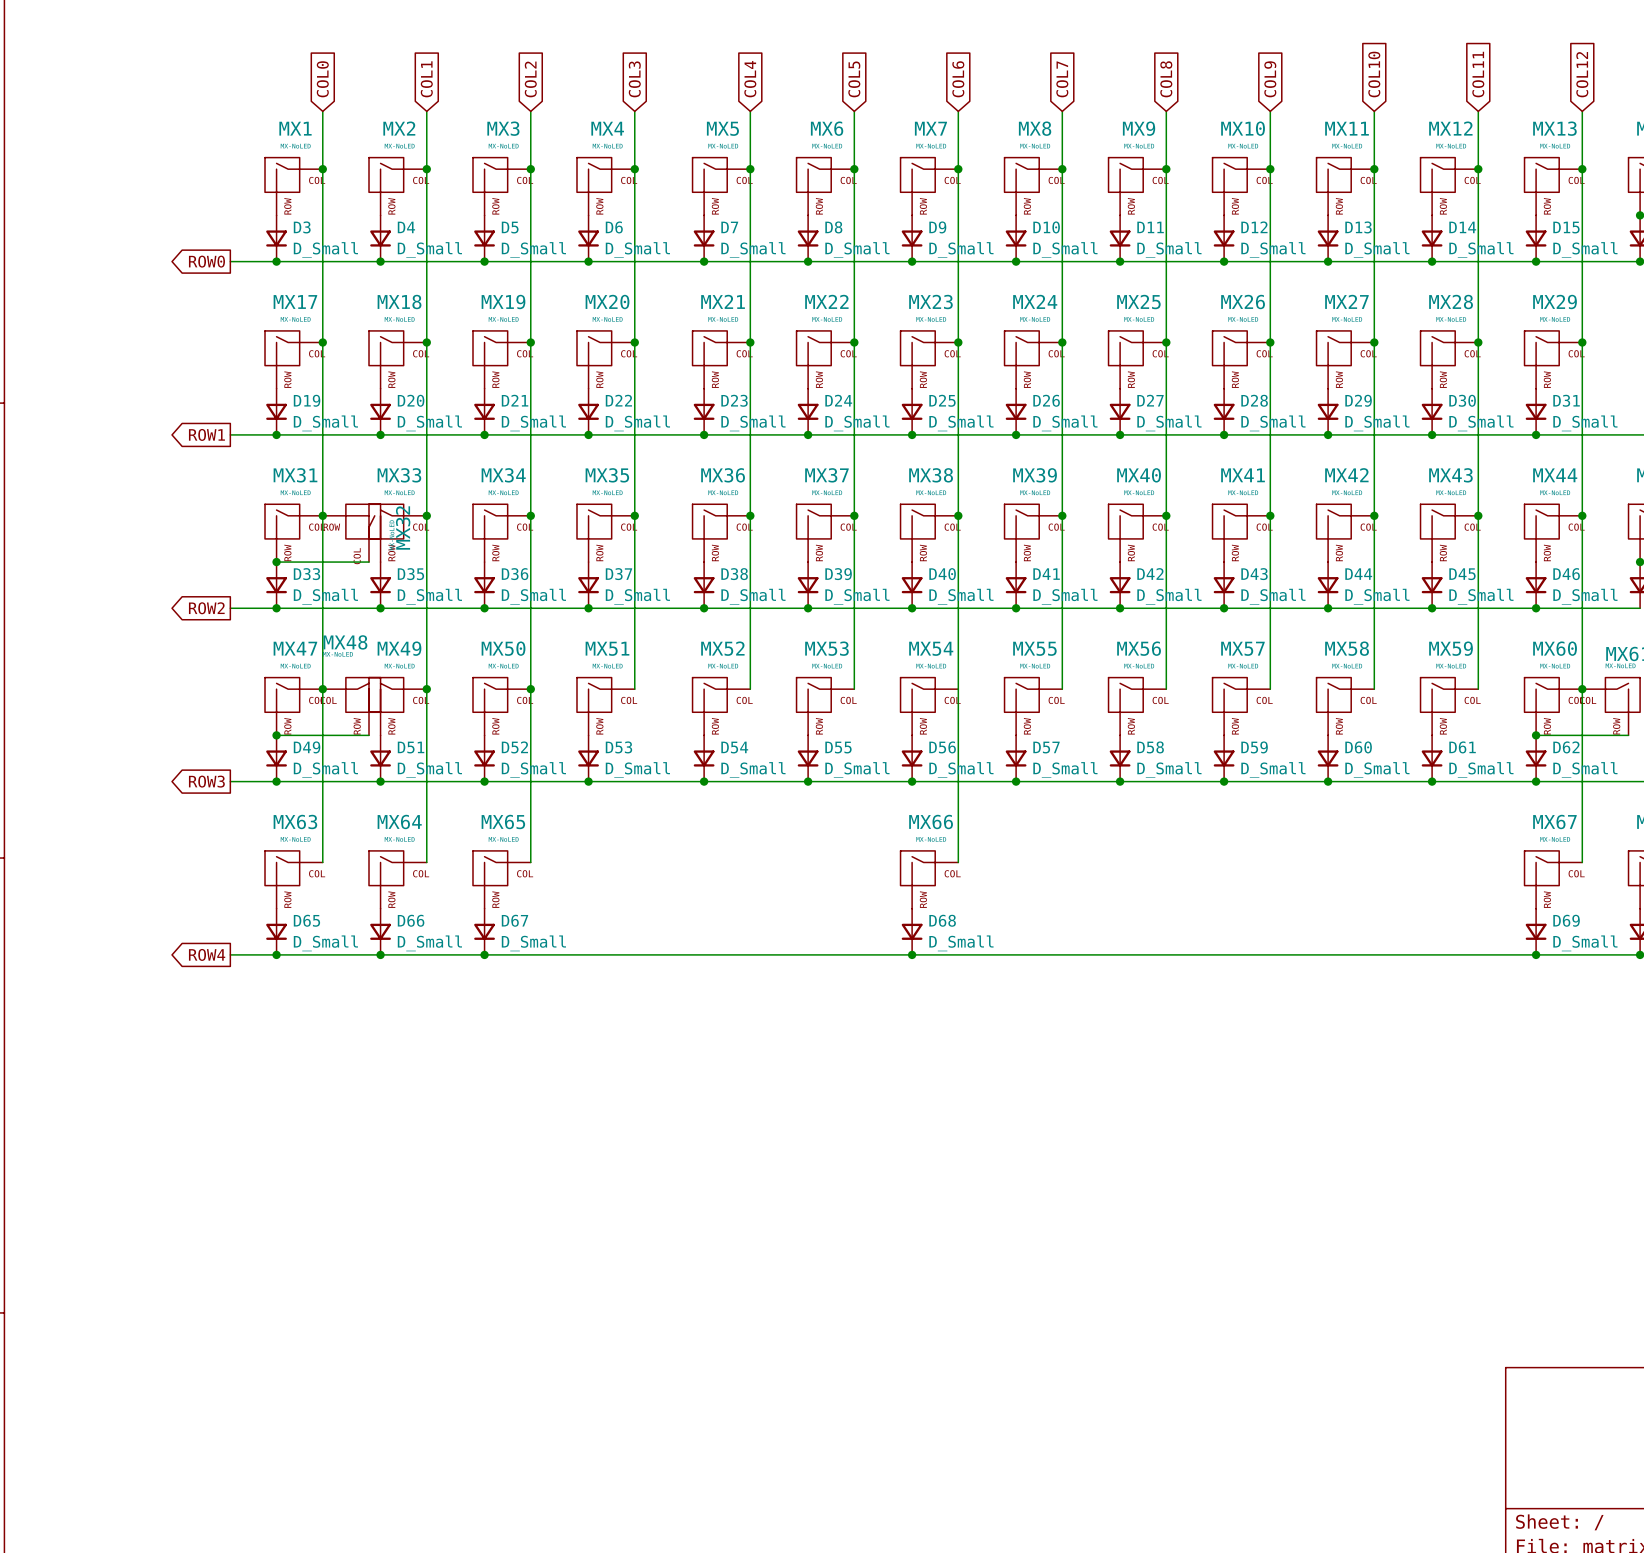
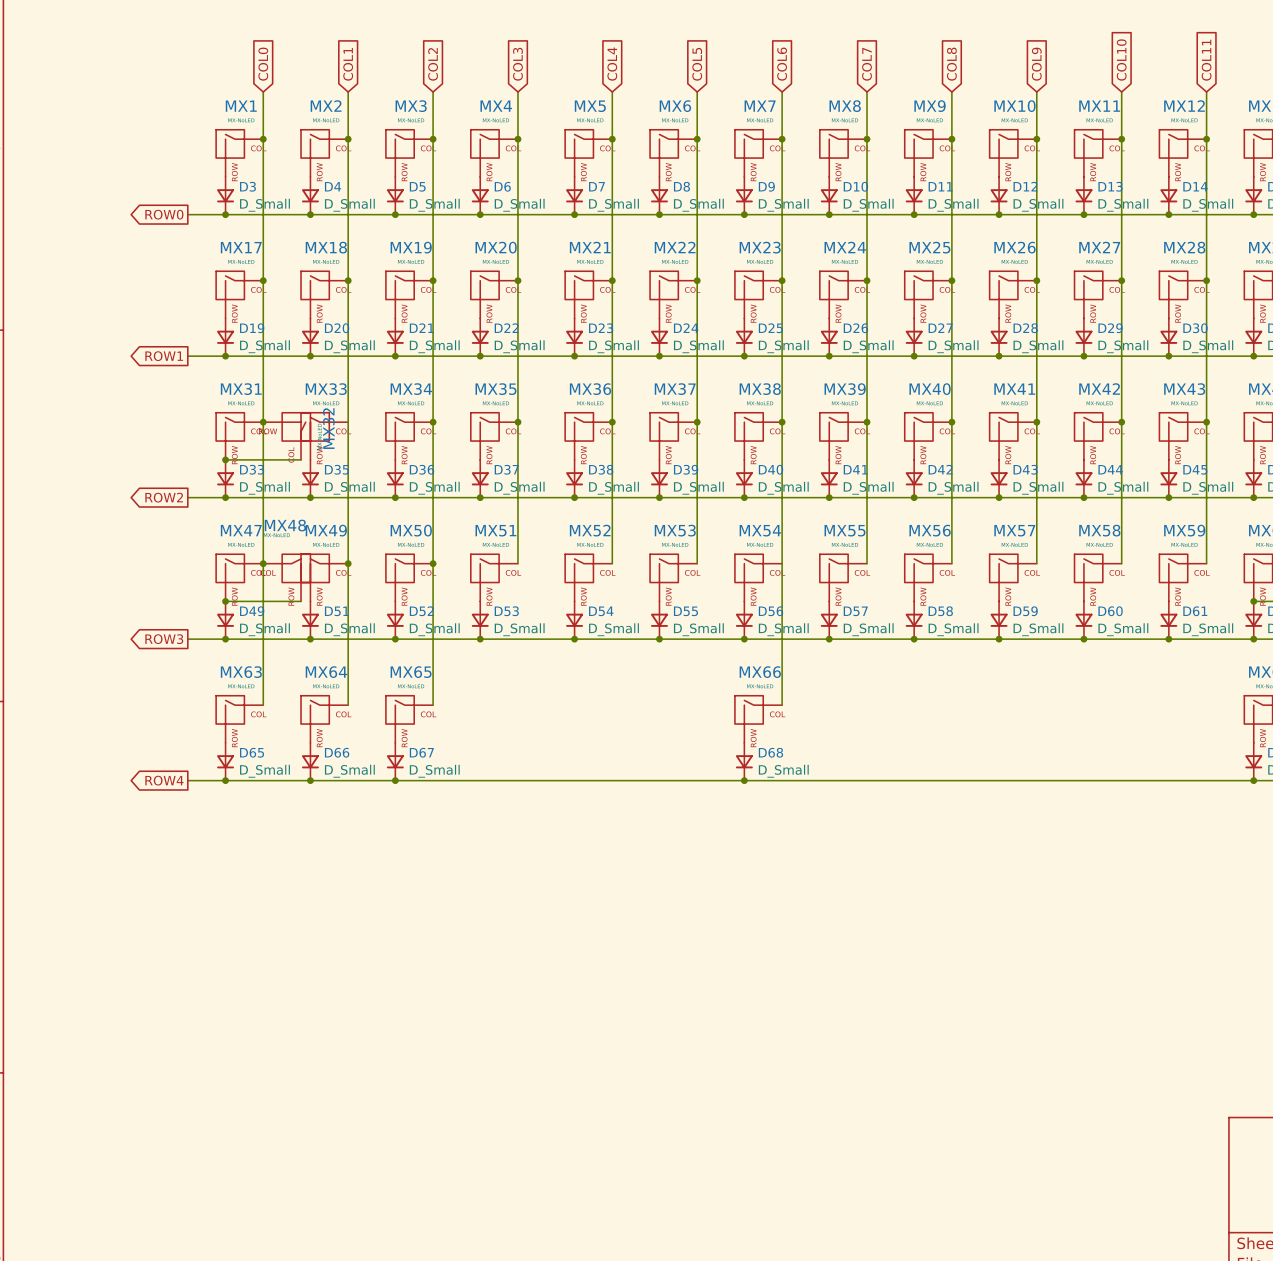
junction: (426, 515) -> none

